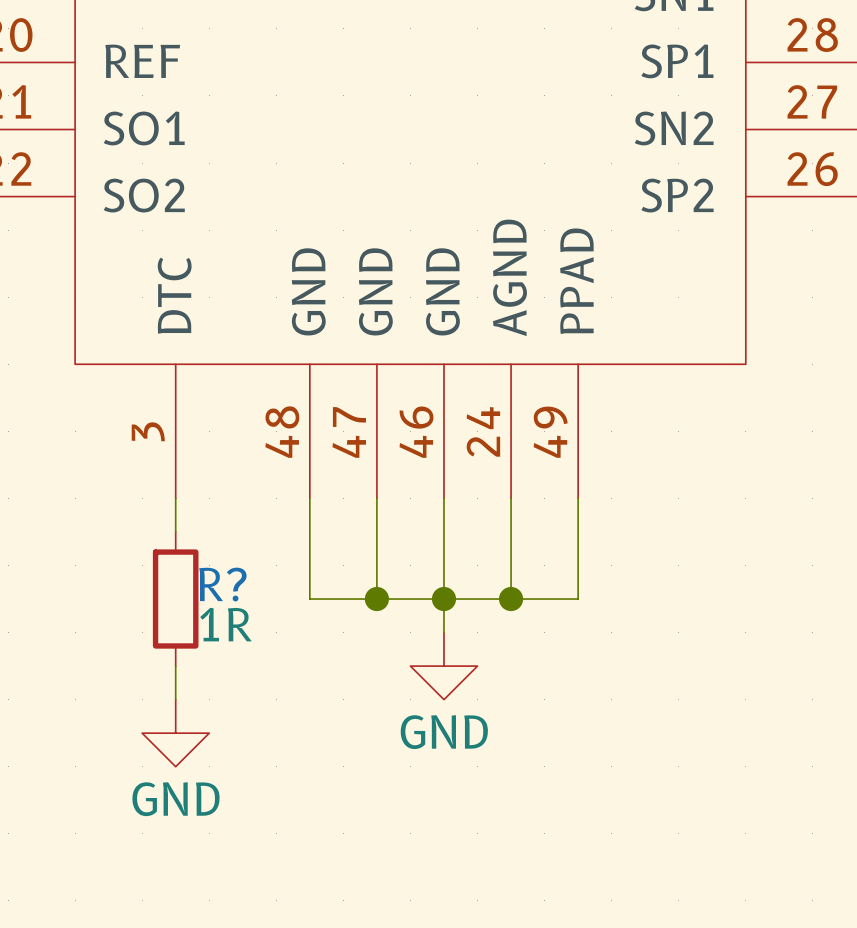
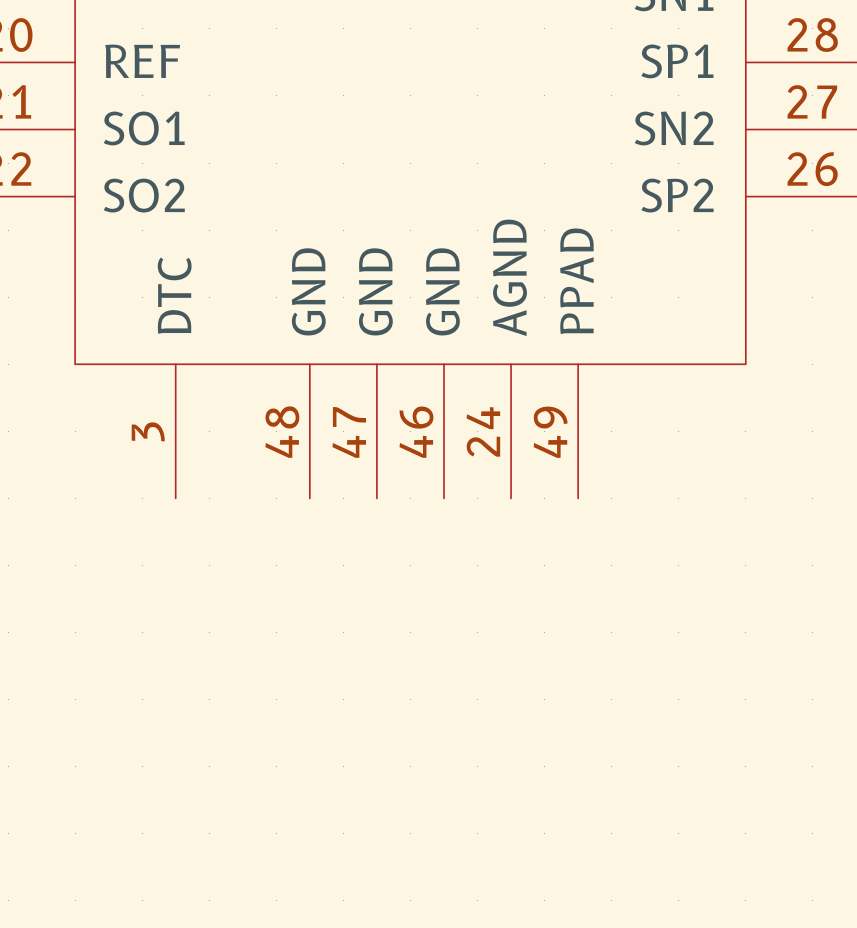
wire: (175, 498) (175, 531) -> none
wire: (309, 498) (309, 599) (578, 599) (578, 498) -> none
wire: (376, 498) (376, 599) -> none
wire: (443, 498) (443, 632) -> none
wire: (511, 498) (511, 599) -> none
R?: 1R (175, 599) -> none
junction: (376, 599) -> none
junction: (443, 599) -> none
junction: (511, 599) -> none
wire: (175, 666) (175, 699) -> none
power symbol: GND (443, 666) -> none
power symbol: GND (175, 733) -> none

